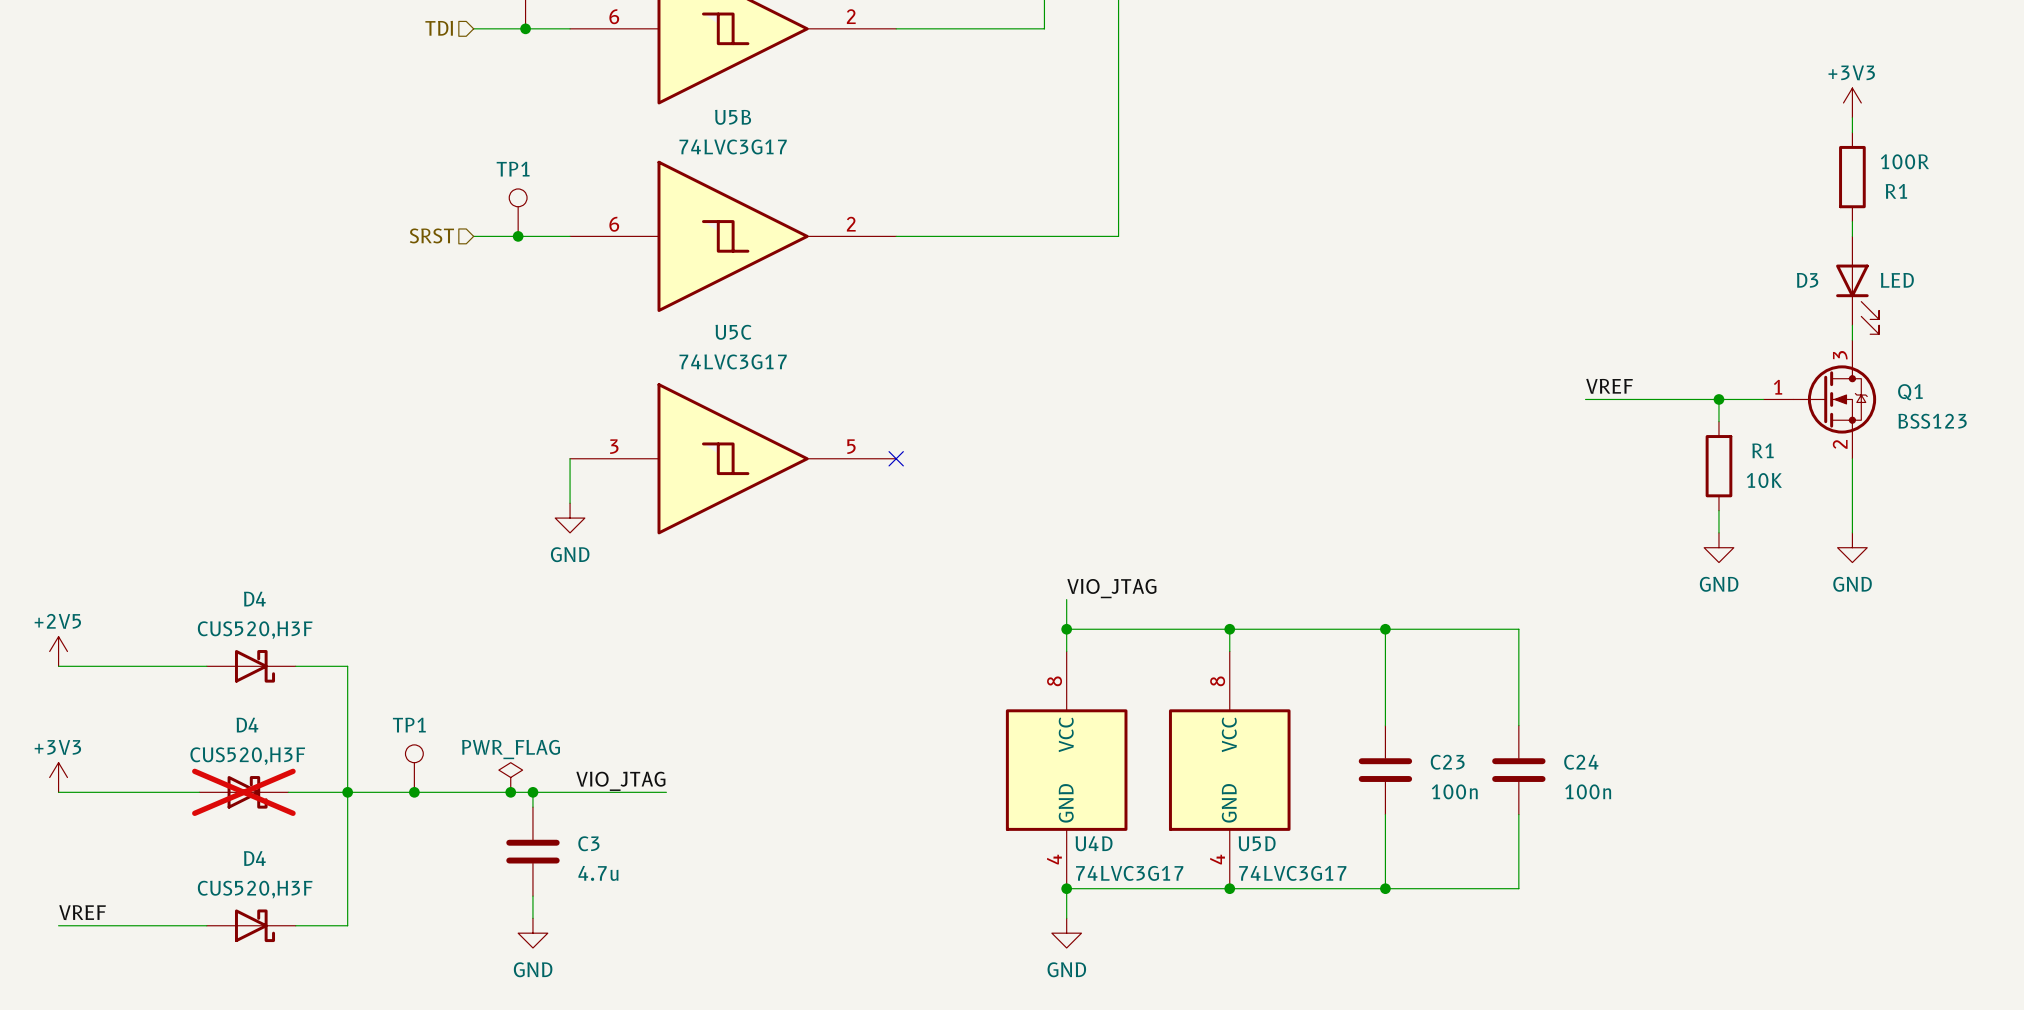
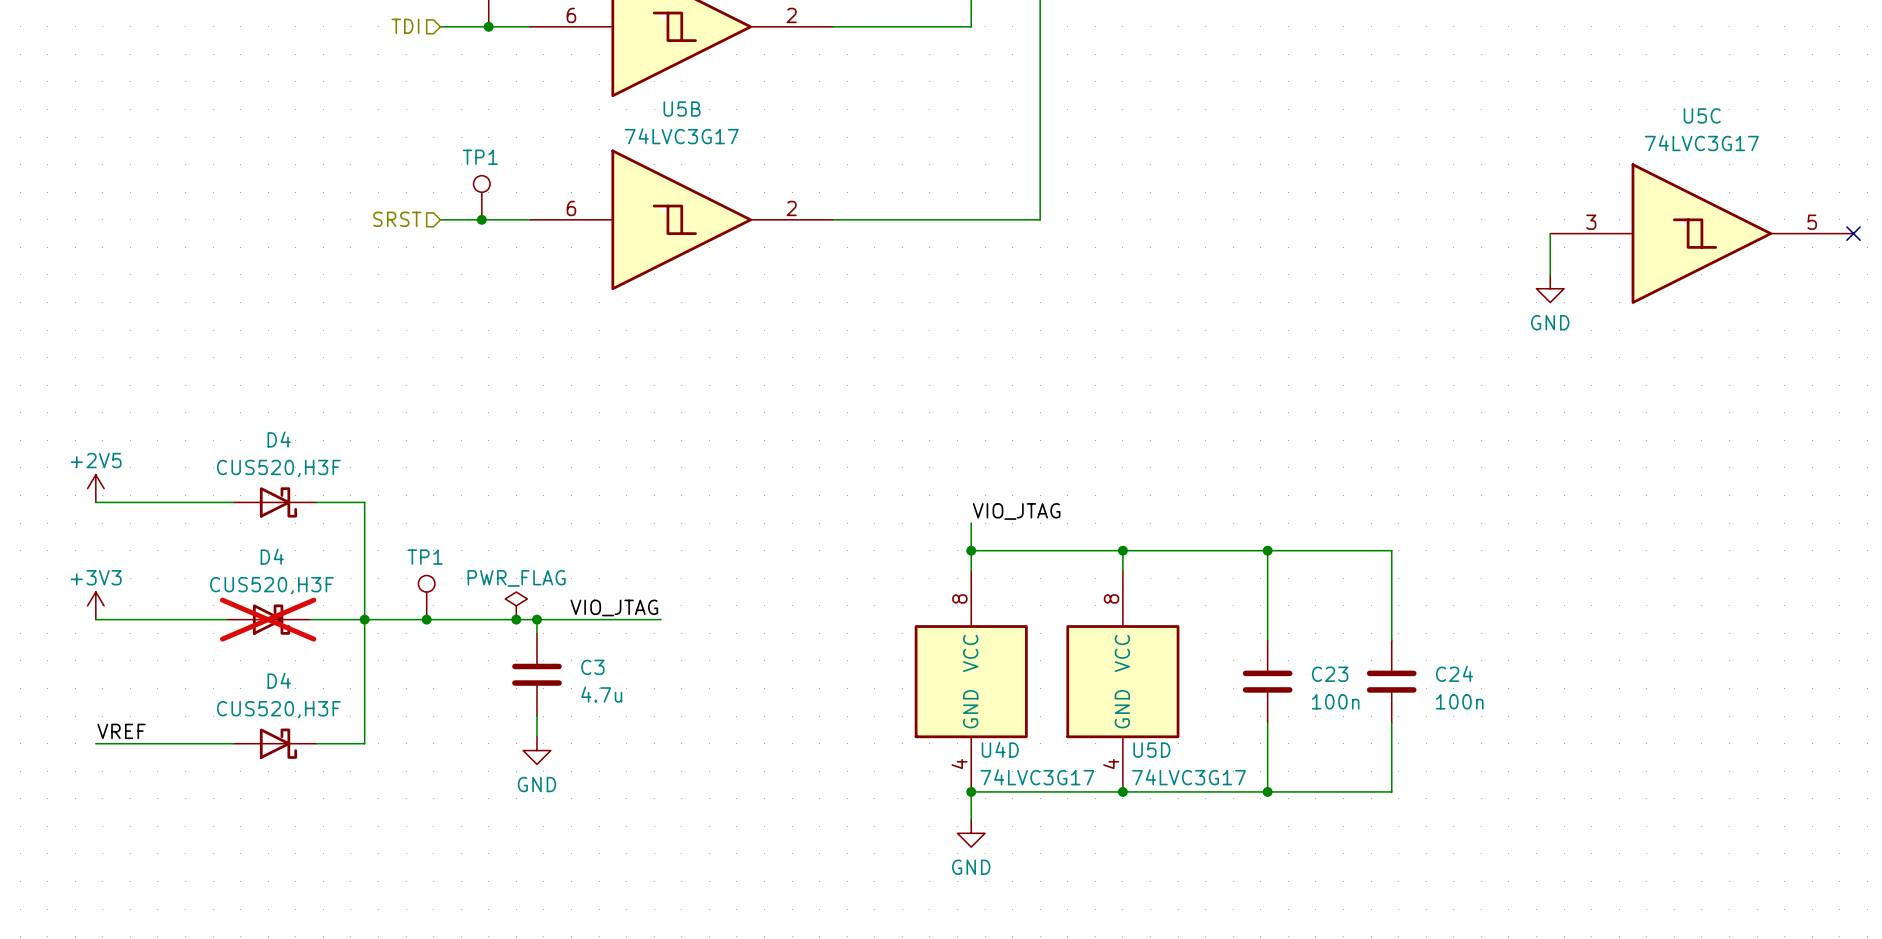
power symbol: +3V3 (1852, 102) -> none
wire: (1852, 117) (1852, 132) -> none
R1: 100R (1852, 177) -> none
wire: none -> (1550, 233) (1550, 274)
no-connect mark: none -> (1853, 233)
D3: LED (1857, 285) -> none
power symbol: none -> GND (1550, 288)
wire: (1852, 325) (1852, 340) -> none
label: VREF (1609, 386) -> none
wire: (1585, 399) (1763, 399) -> none
wire: (1718, 399) (1718, 421) -> none
junction: (1718, 399) -> none
Q1: BSS123 (1819, 399) -> none
wire: (570, 458) (570, 503) -> none
U5C position: (733, 458) -> (1701, 233)
no-connect mark: (896, 458) -> none
wire: (1852, 458) (1852, 532) -> none
R1: 10K (1718, 466) -> none
wire: (1718, 510) (1718, 532) -> none
power symbol: GND (570, 518) -> none
wire: none -> (95, 502) (233, 502)
D4: none -> CUS520,H3F (275, 502)
wire: none -> (316, 502) (364, 502) (364, 743) (316, 743)
power symbol: GND (1718, 547) -> none
power symbol: GND (1852, 547) -> none
label position: VIO_JTAG (1111, 588) -> VIO_JTAG (1016, 511)
wire: (1066, 599) (1066, 651) -> (971, 523) (971, 571)
wire: (1066, 629) (1518, 629) (1518, 725) -> (971, 550) (1391, 550) (1391, 640)
junction position: (1066, 629) -> (971, 550)
wire: (1229, 629) (1229, 651) -> (1122, 550) (1122, 571)
junction position: (1229, 629) -> (1122, 550)
wire: (1385, 629) (1385, 725) -> (1267, 550) (1267, 640)
junction position: (1385, 629) -> (1267, 550)
power symbol position: +2V5 (58, 651) -> +2V5 (95, 488)
wire: (58, 666) (103, 666) -> none
D4 position: (251, 666) -> (268, 619)
D4 do-not-place cross: none -> (268, 619)
wire: (347, 666) (347, 925) (295, 925) -> (323, 619) (661, 619)
junction: none -> (364, 619)
junction: none -> (426, 619)
junction: none -> (516, 619)
junction: none -> (536, 619)
TP1 position: (414, 768) -> (426, 597)
U4D position: (1066, 770) -> (971, 681)
U5D position: (1229, 770) -> (1122, 681)
C23 position: (1385, 770) -> (1267, 681)
C24 position: (1518, 770) -> (1391, 681)
power symbol position: +3V3 (58, 777) -> +3V3 (95, 605)
power symbol position: PWR_FLAG (510, 777) -> PWR_FLAG (516, 605)
label position: VIO_JTAG (620, 781) -> VIO_JTAG (614, 607)
wire: (58, 792) (199, 792) -> none
D4 position: (243, 792) -> (275, 743)
D4 do-not-place cross: (243, 792) -> none
wire: (288, 792) (666, 792) -> none
junction: (347, 792) -> none
junction: (414, 792) -> none
junction: (510, 792) -> none
wire: (532, 792) (532, 807) -> (536, 619) (536, 633)
junction: (532, 792) -> none
wire: (1385, 814) (1385, 888) -> (1267, 723) (1267, 791)
wire: (1518, 814) (1518, 888) (1066, 888) (1066, 918) -> (1391, 723) (1391, 791) (971, 791) (971, 819)
C3 position: (532, 851) -> (536, 674)
junction position: (1066, 888) -> (971, 791)
junction position: (1229, 888) -> (1122, 791)
junction position: (1385, 888) -> (1267, 791)
wire: (532, 896) (532, 918) -> (536, 716) (536, 736)
label position: VREF (82, 912) -> VREF (121, 731)
wire: (58, 925) (206, 925) -> (95, 743) (233, 743)
D4: CUS520,H3F (251, 925) -> none
power symbol position: GND (532, 933) -> GND (536, 750)
power symbol position: GND (1066, 933) -> GND (971, 833)

